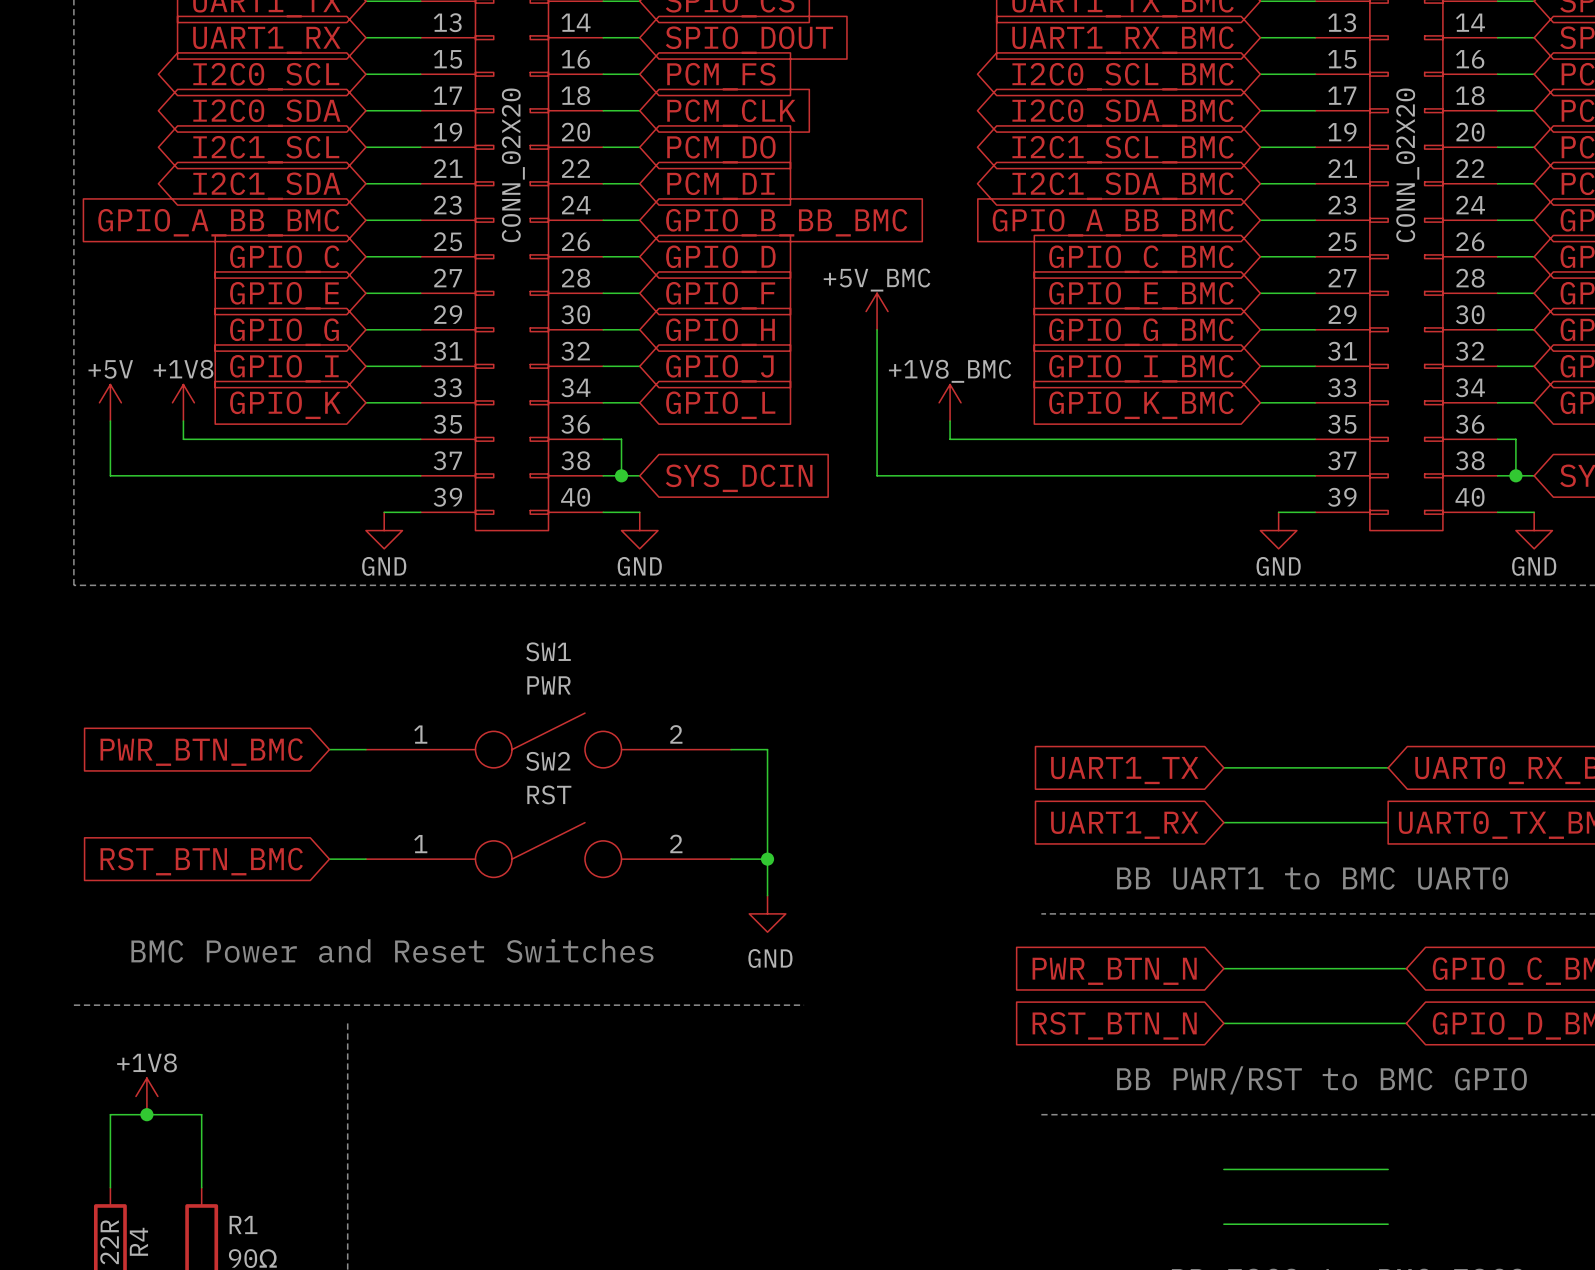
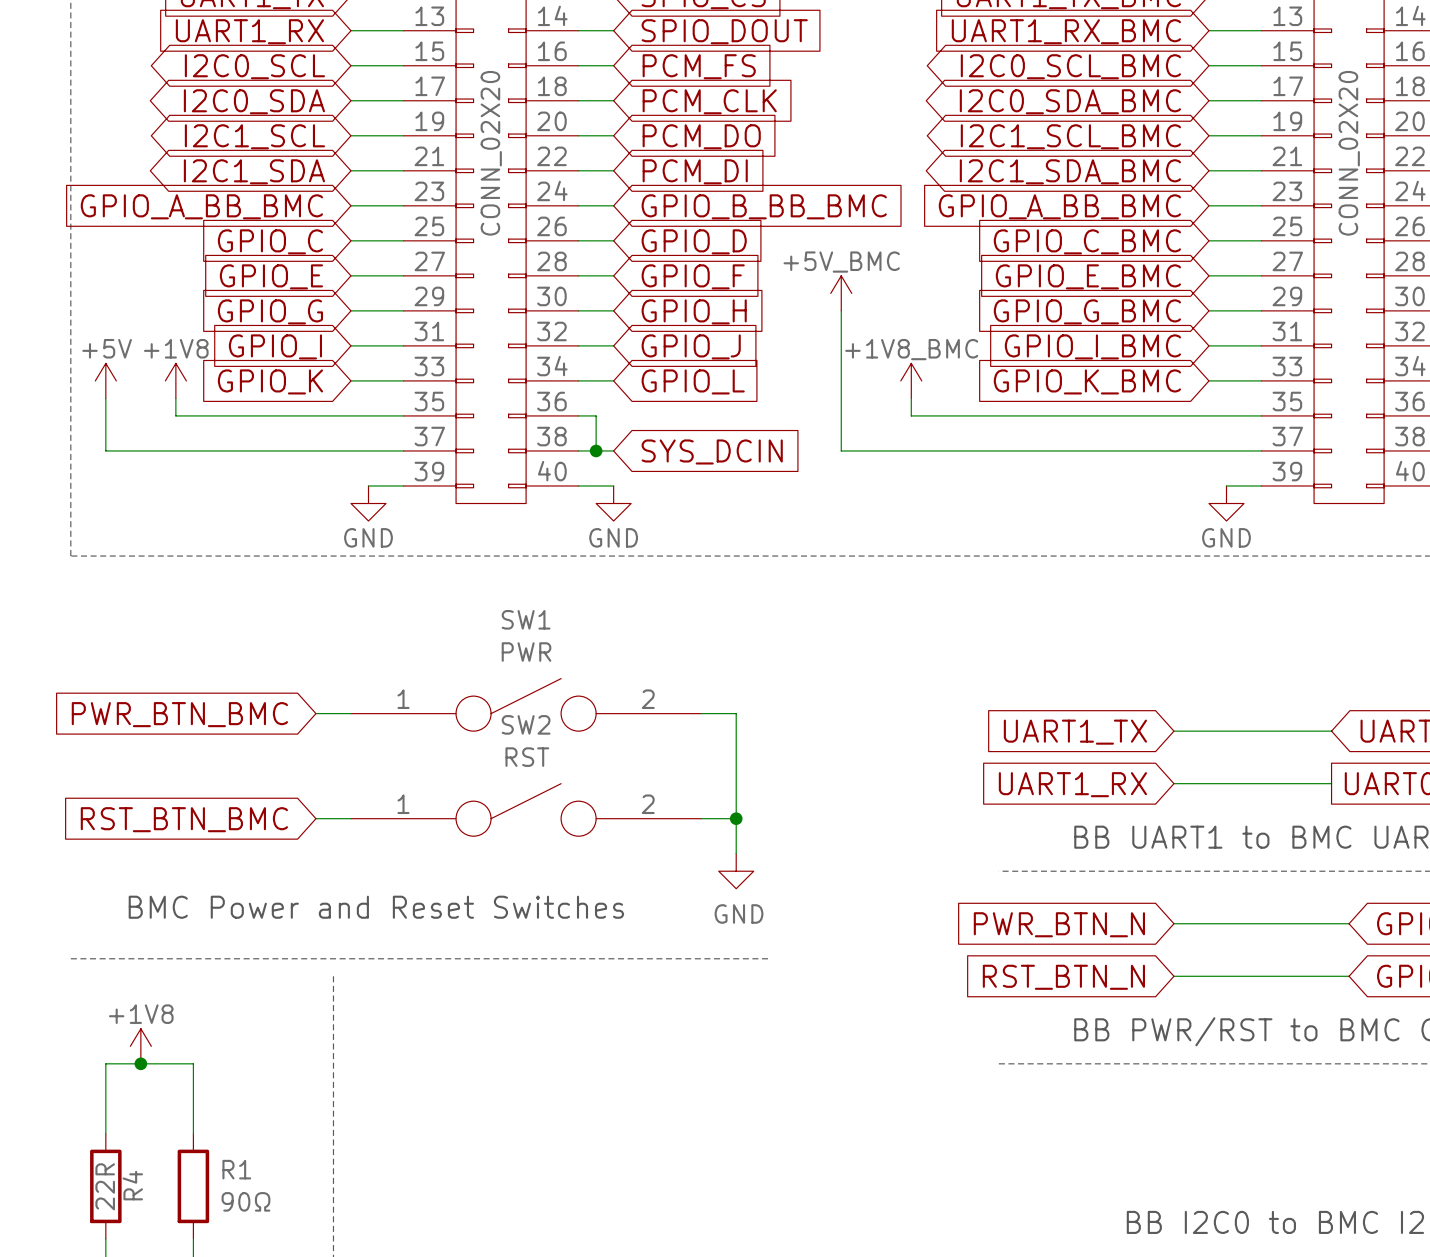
wire: (1223, 1169) (1388, 1169) -> none
wire: (1223, 1224) (1388, 1224) -> none

